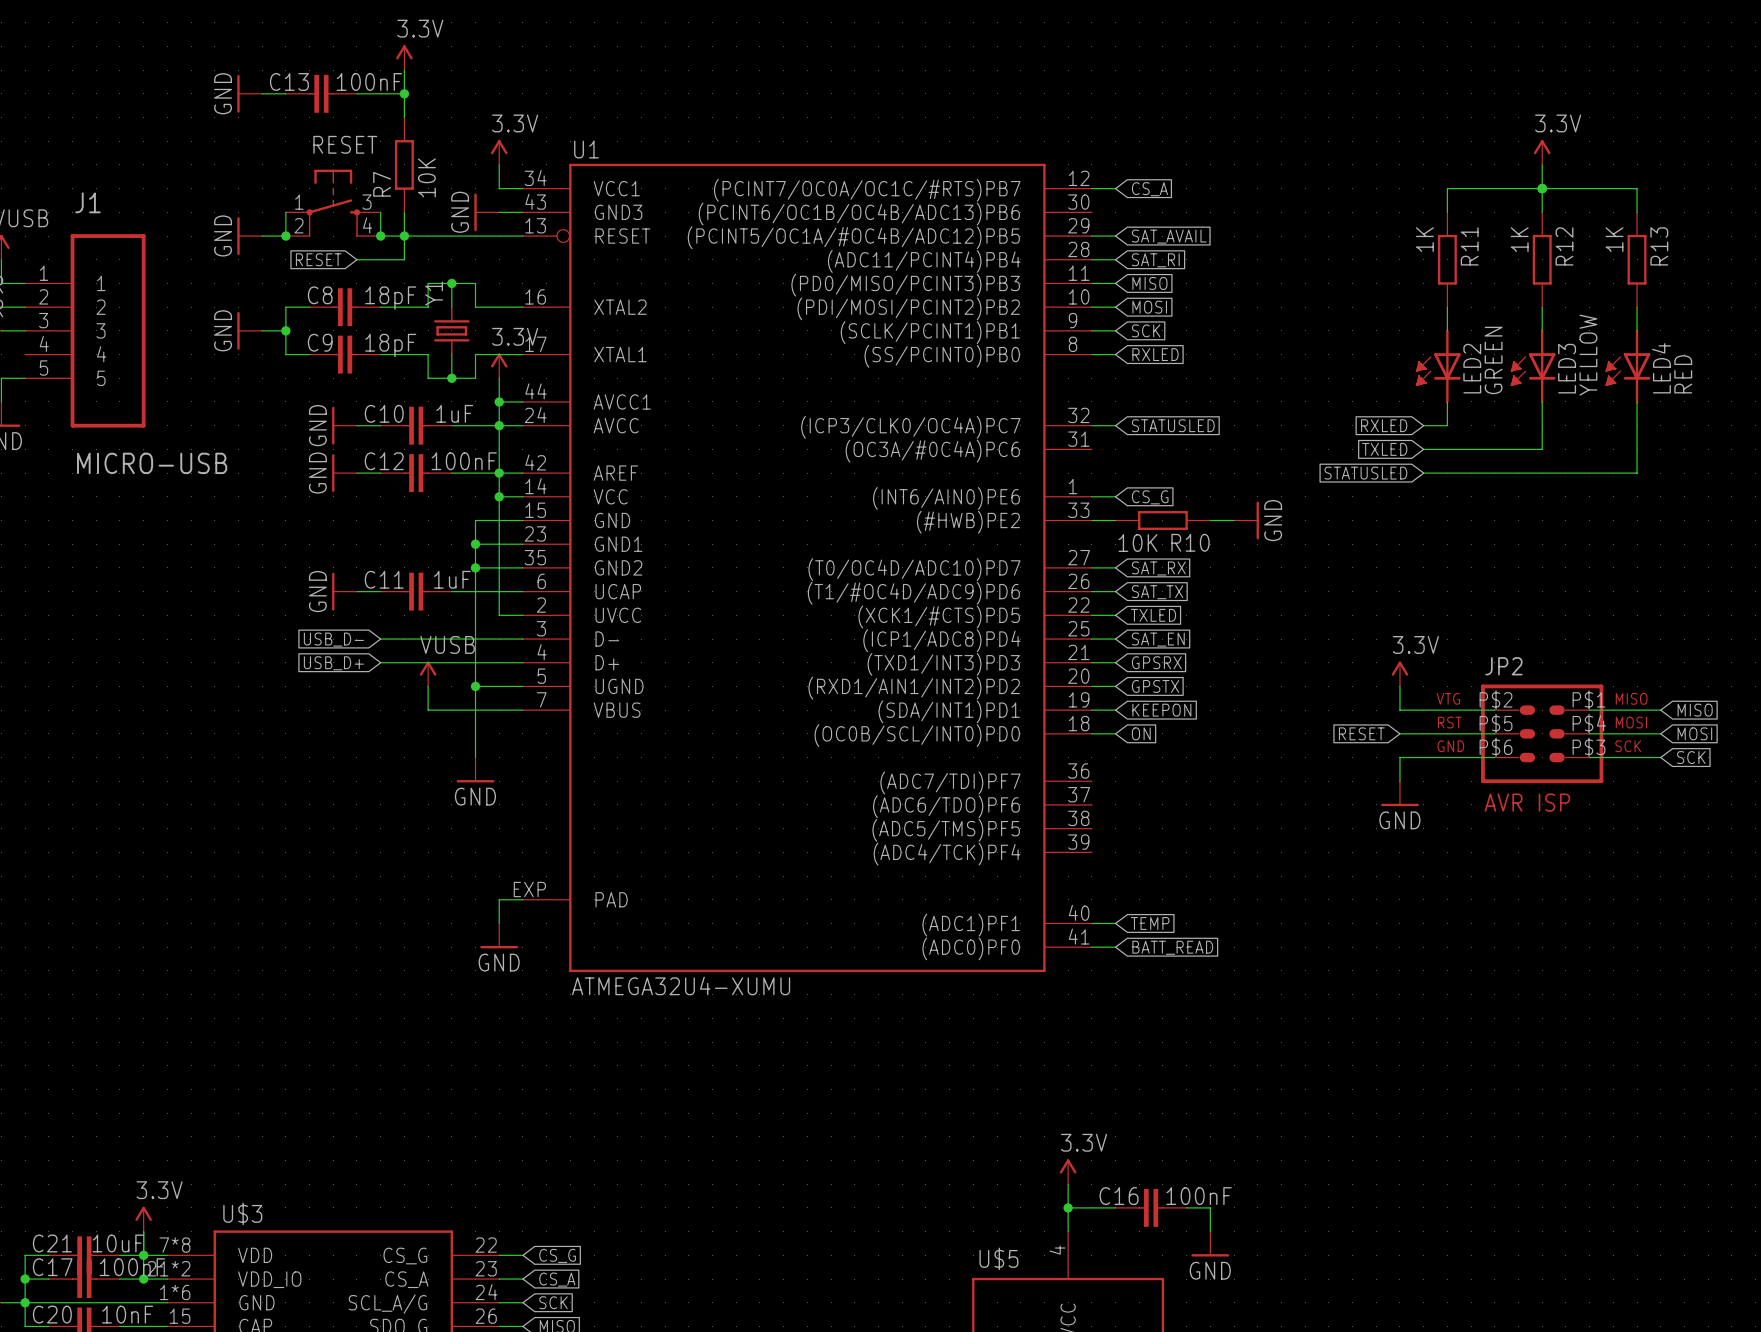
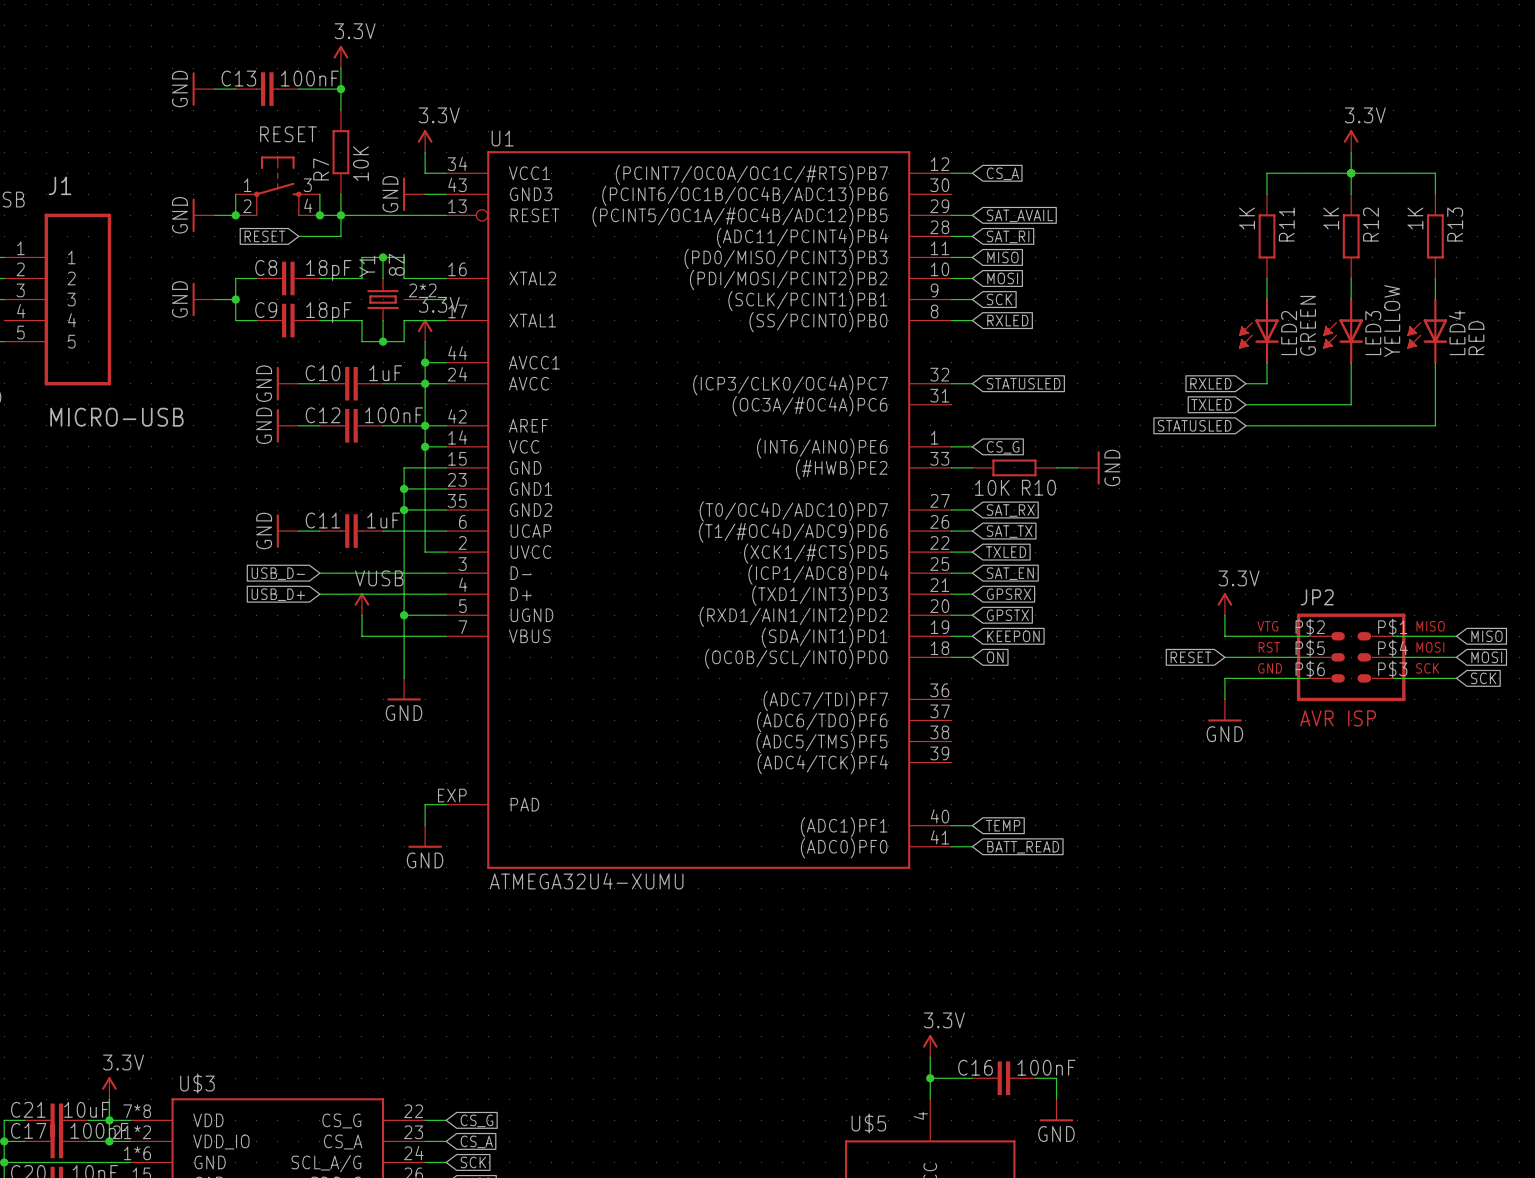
Y1 value: none -> 8Z (396, 264)
Y1 symbol: [434, 306, 470, 356] -> [367, 277, 426, 322]
wire: none -> (425, 299) (446, 299)

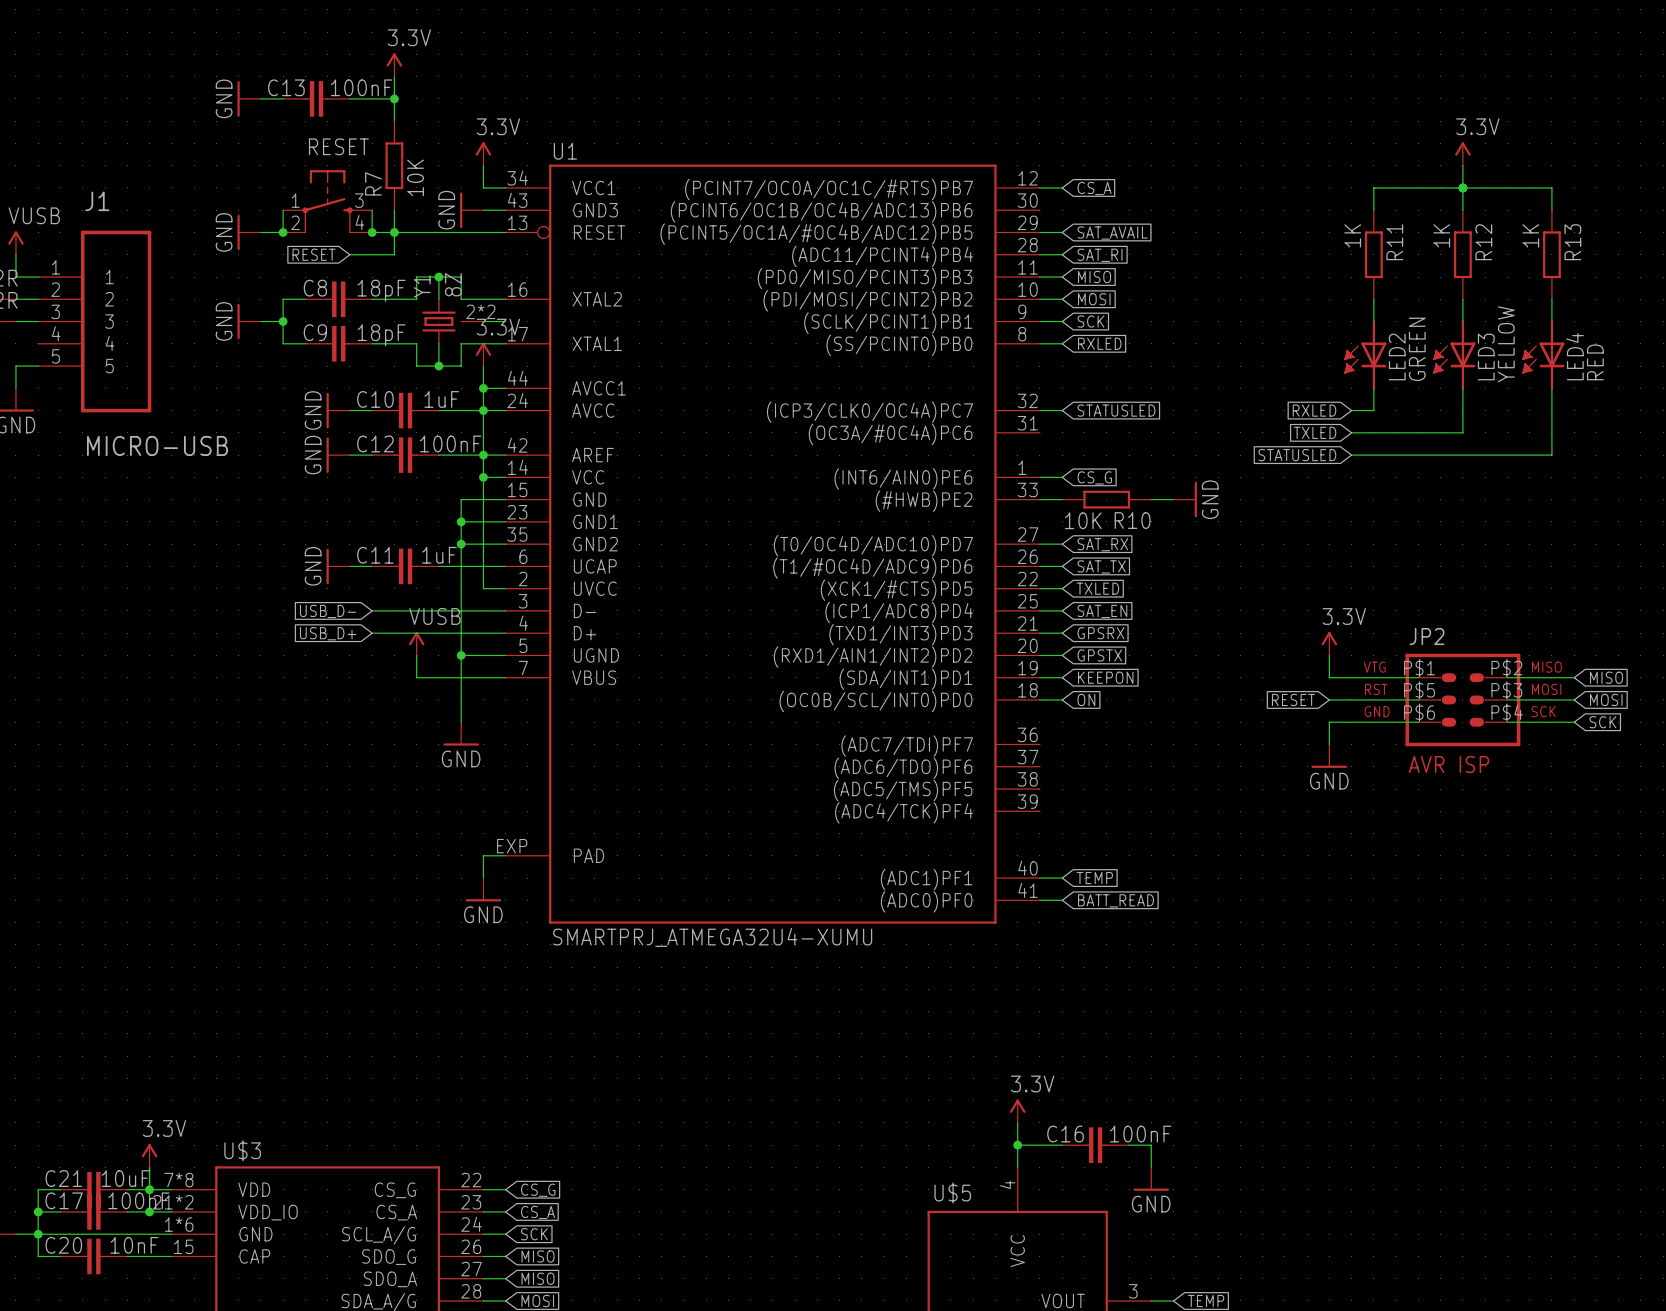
JP2 pin number: P$2 (1310, 627) -> P$1 (1419, 668)
JP2 pin number: P$1 (1392, 627) -> P$2 (1506, 668)
JP2 pin number: P$4 (1393, 648) -> P$3 (1506, 690)
JP2 pin number: P$3 (1392, 669) -> P$4 (1507, 712)
U1 value: ATMEGA32U4-XUMU (586, 881) -> SMARTPRJ_ATMEGA32U4-XUMU (712, 937)

